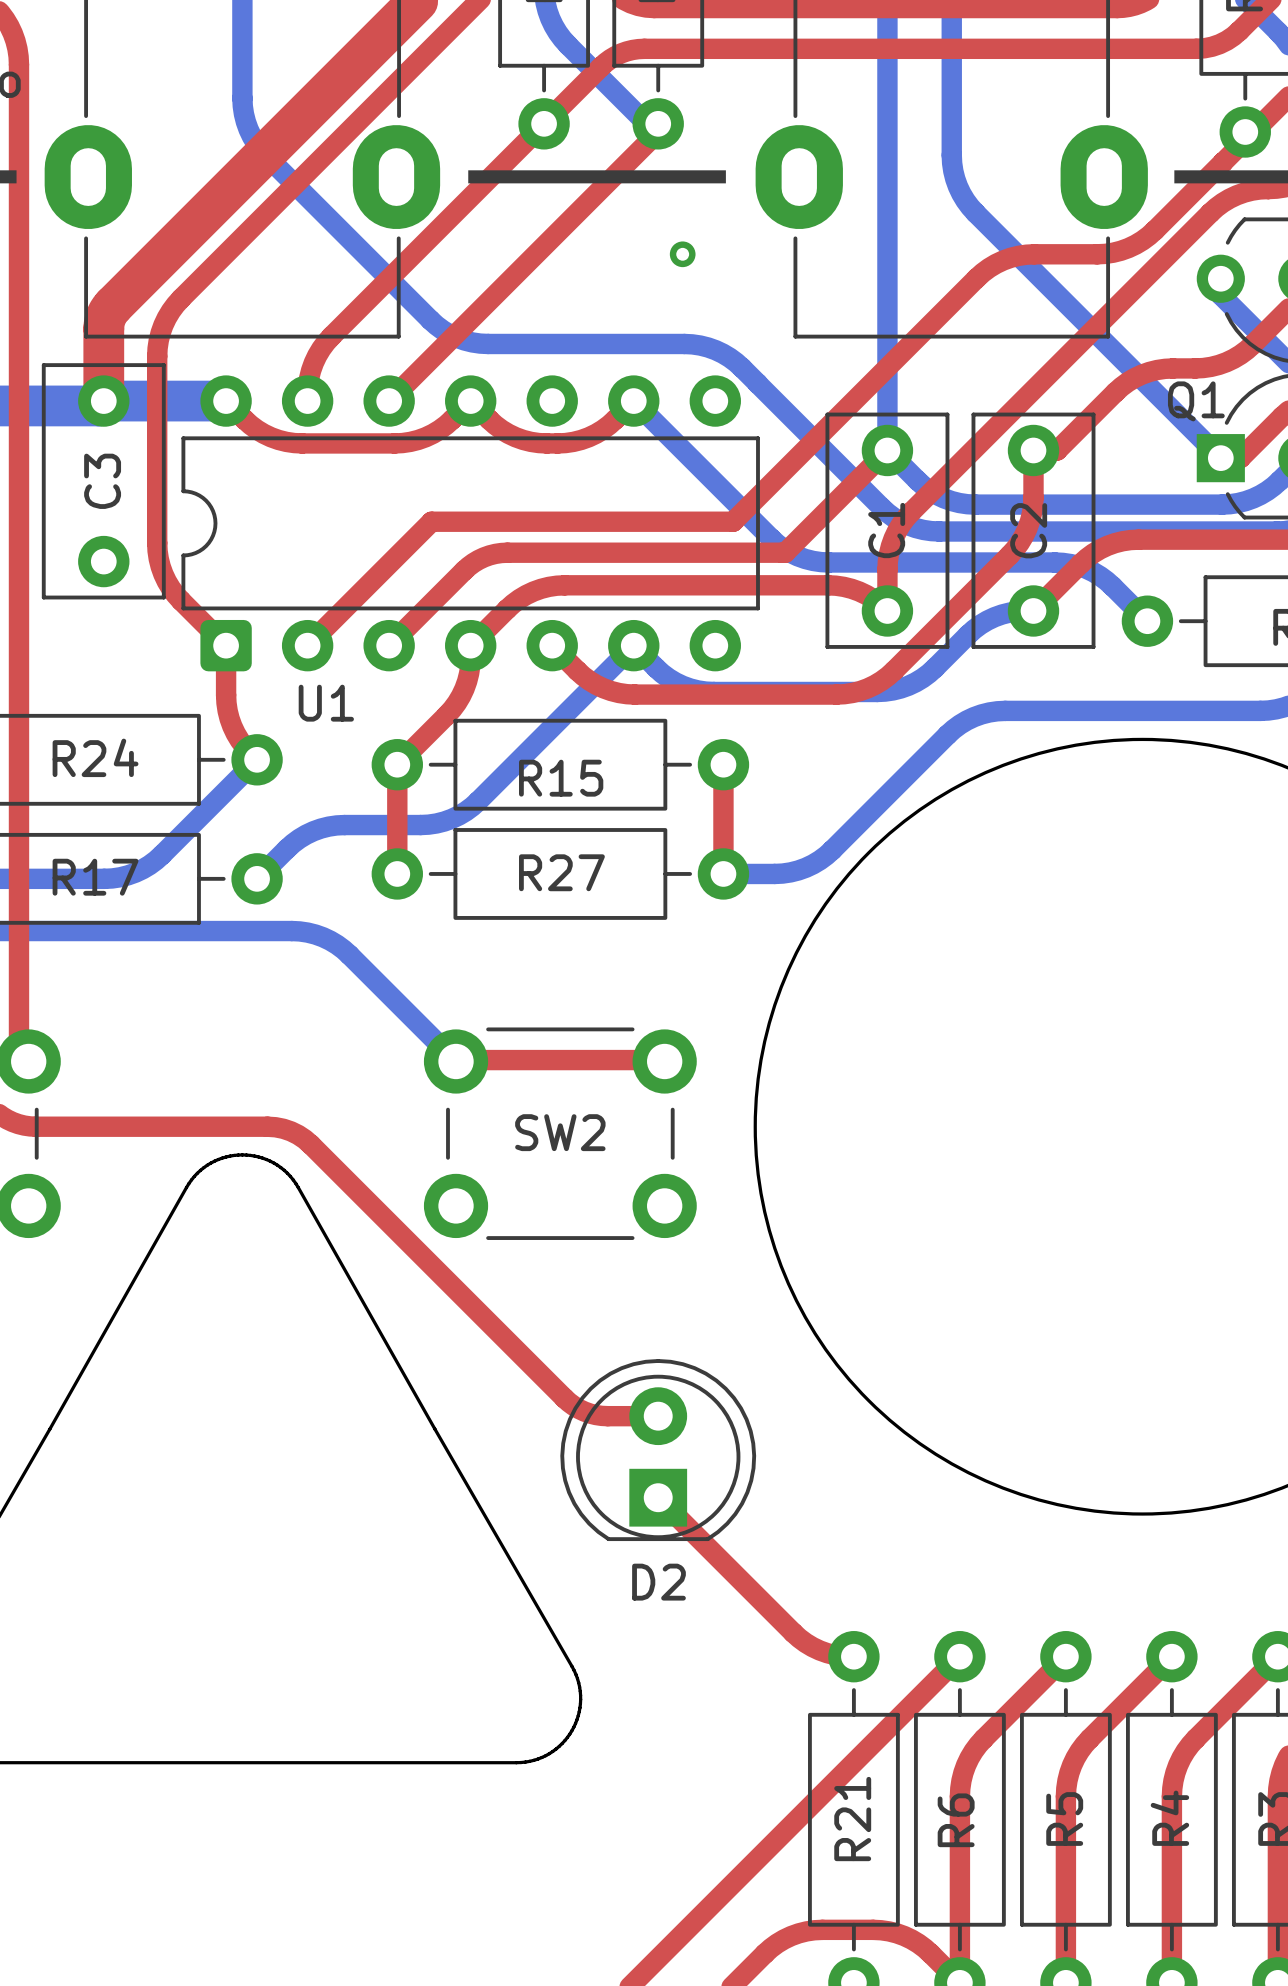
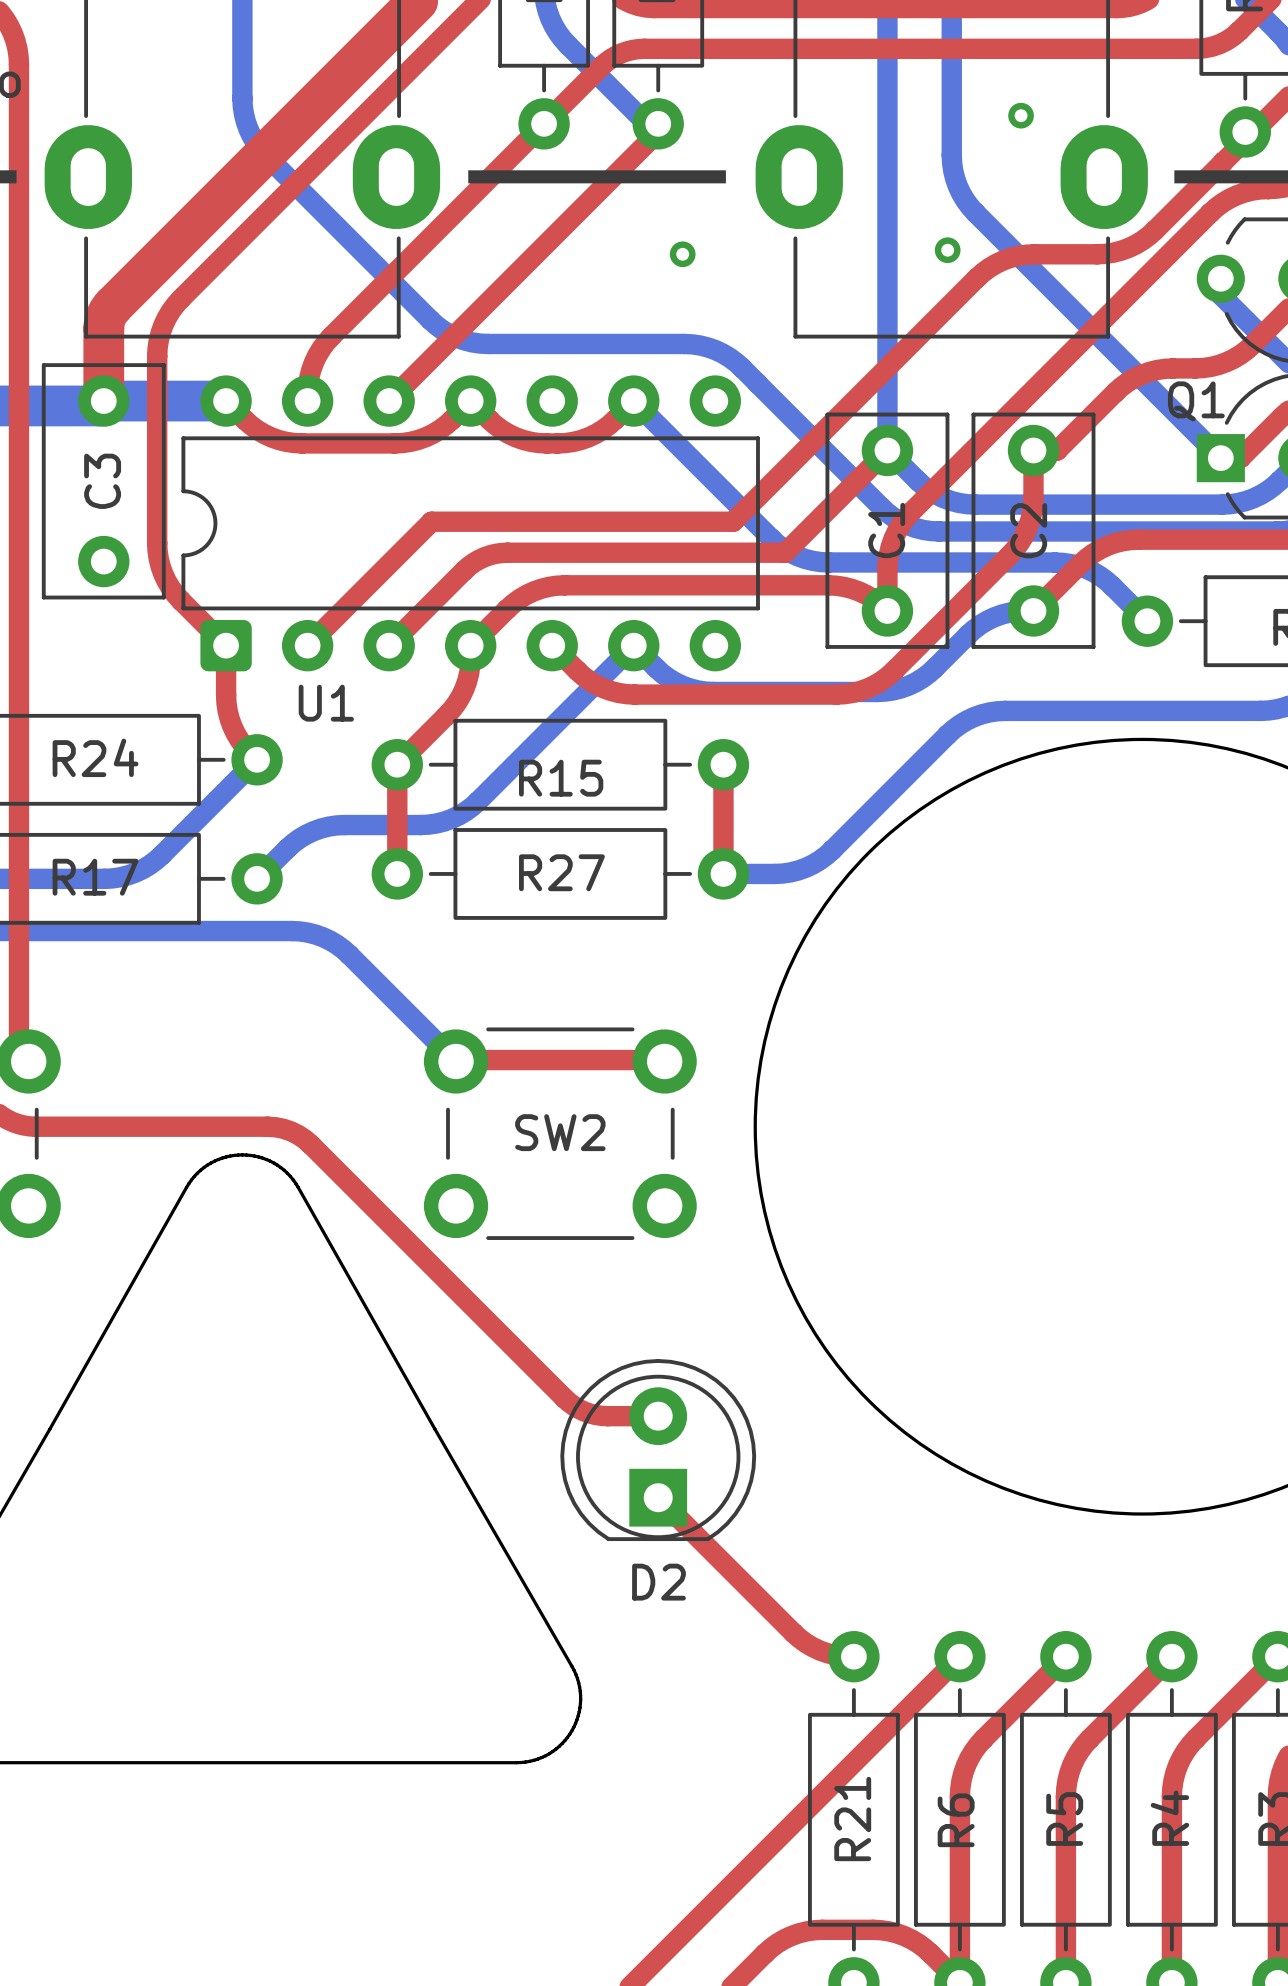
via: none -> (1021, 115)
via: none -> (947, 250)

